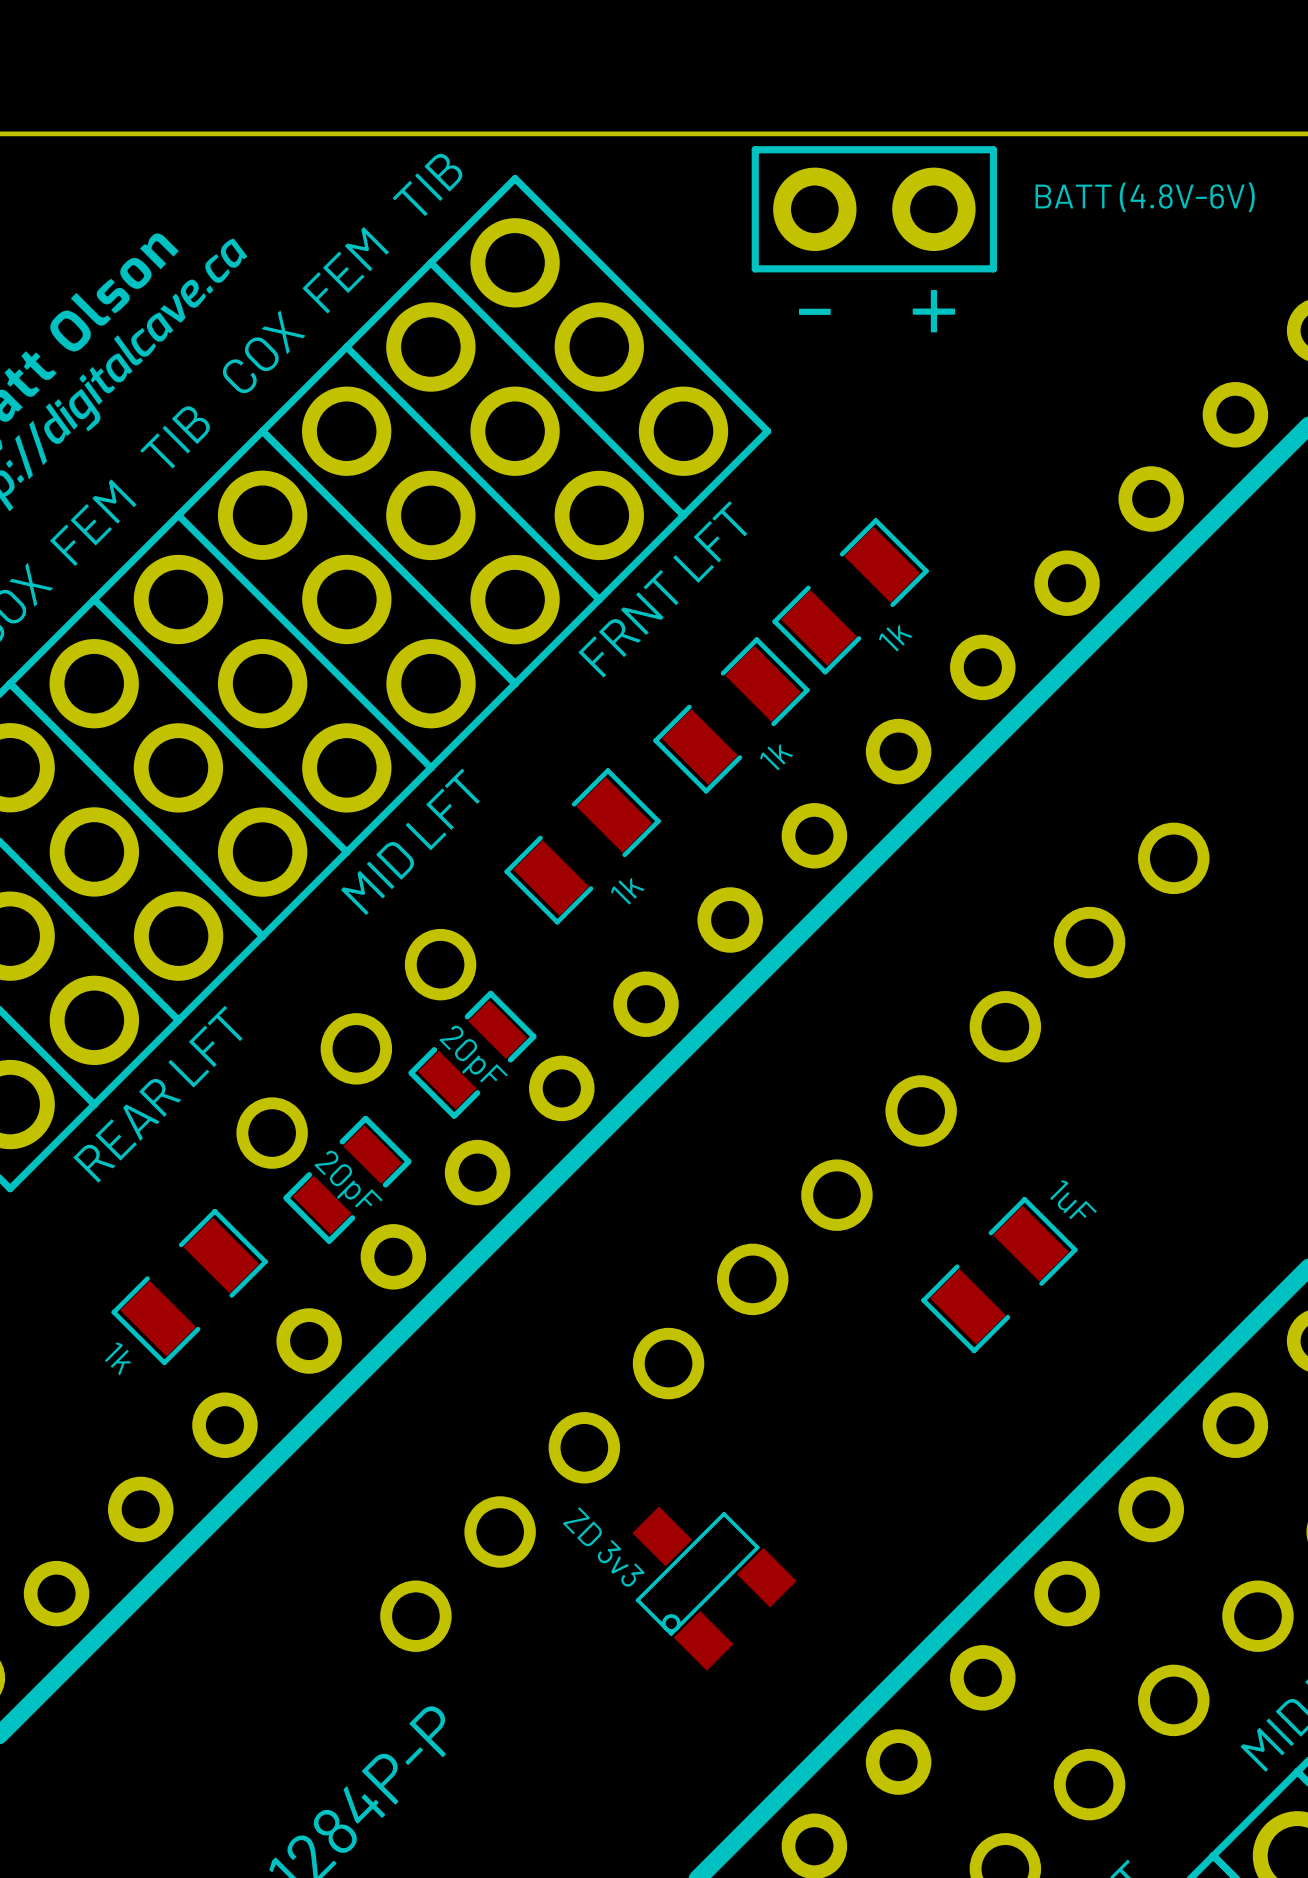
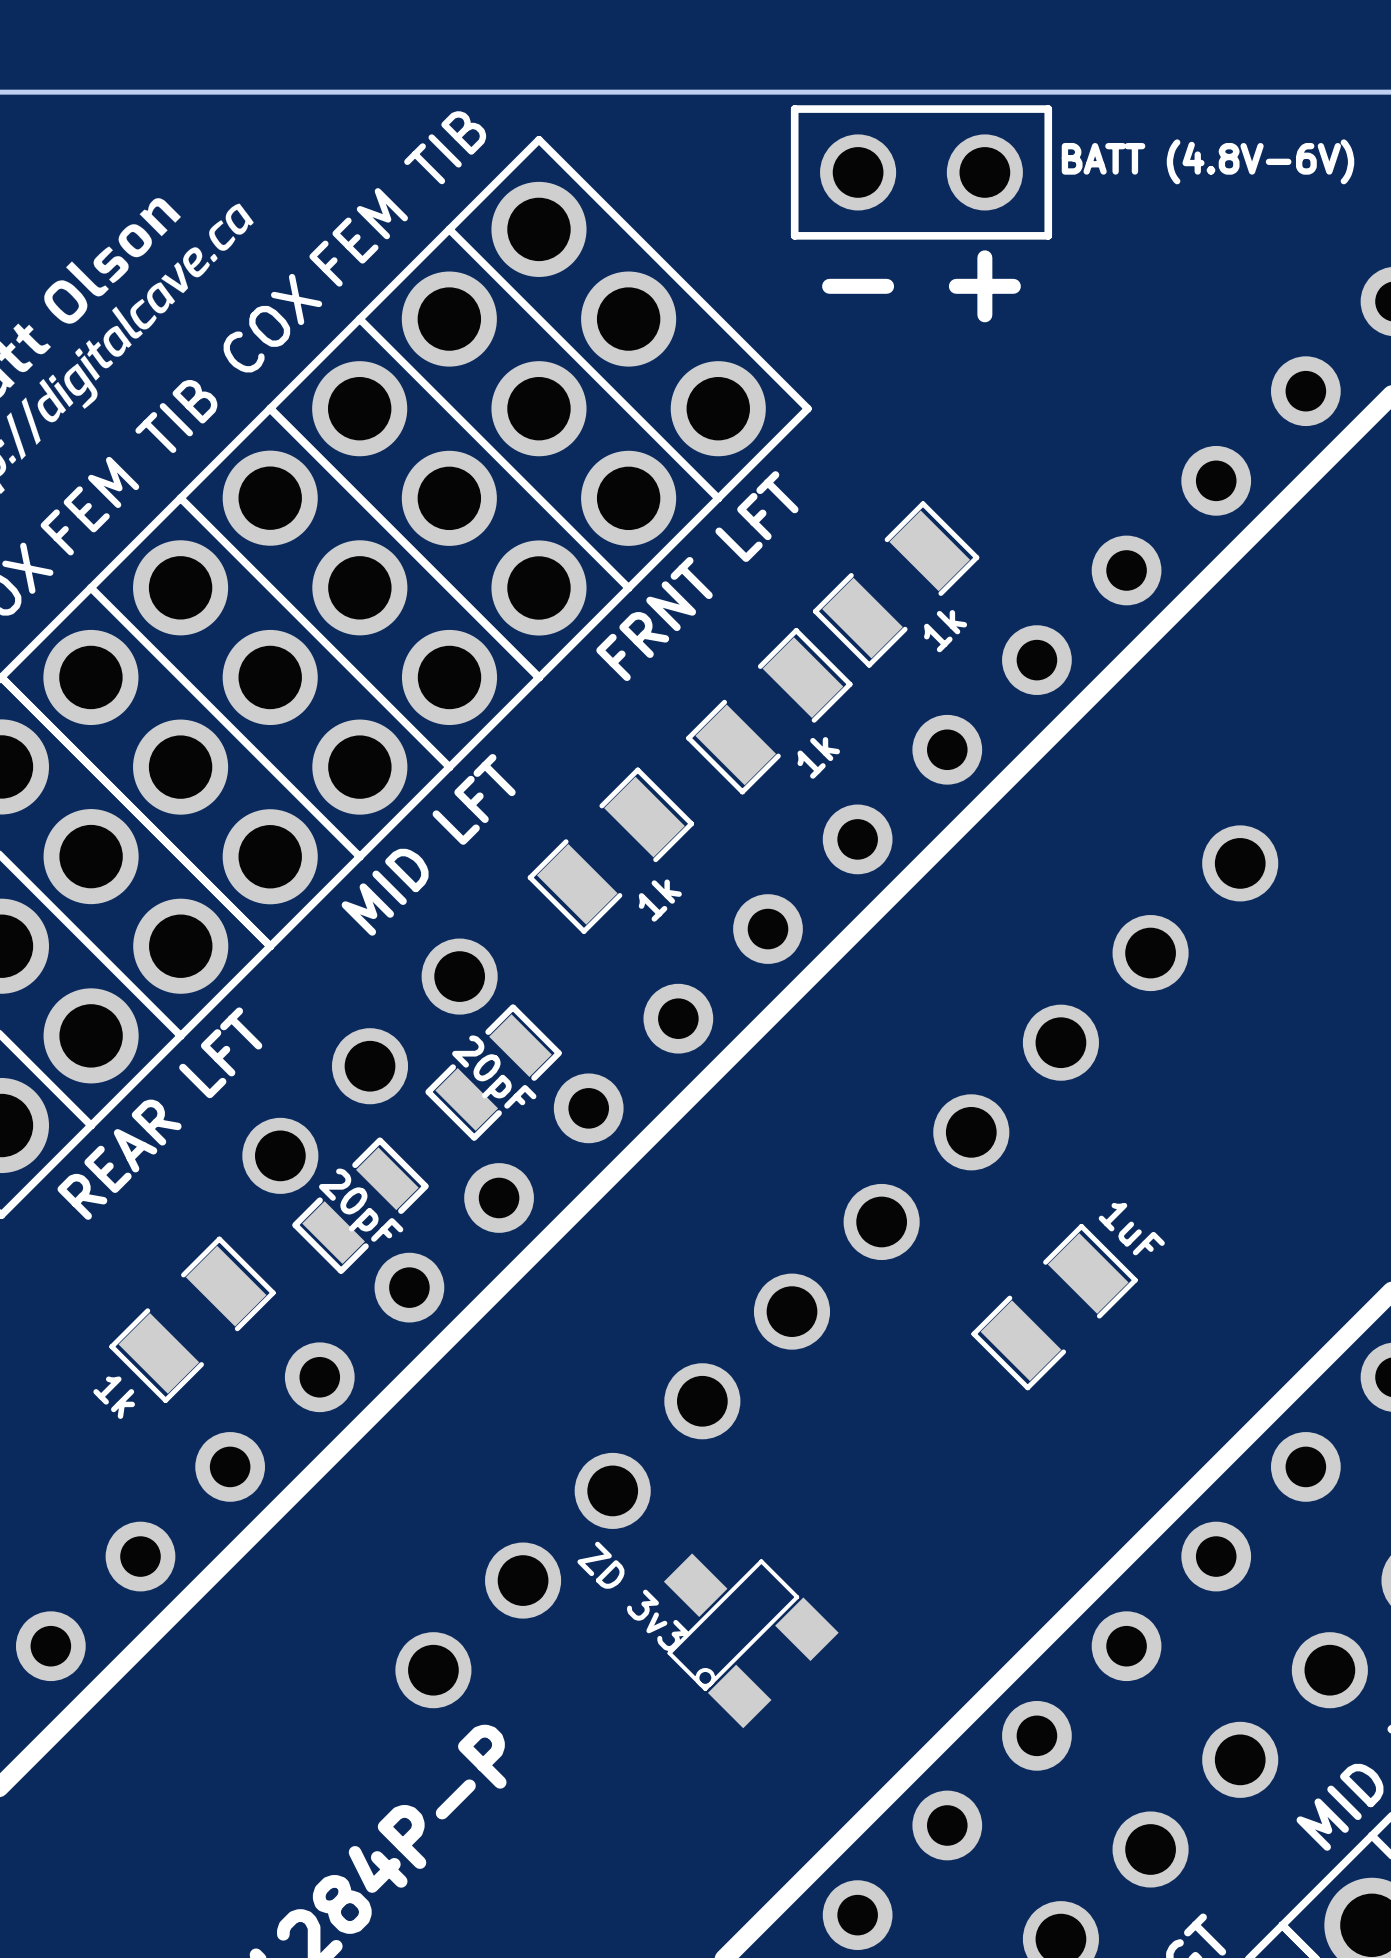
part footprint: [751, 146, 998, 273] -> [790, 105, 1053, 240]

